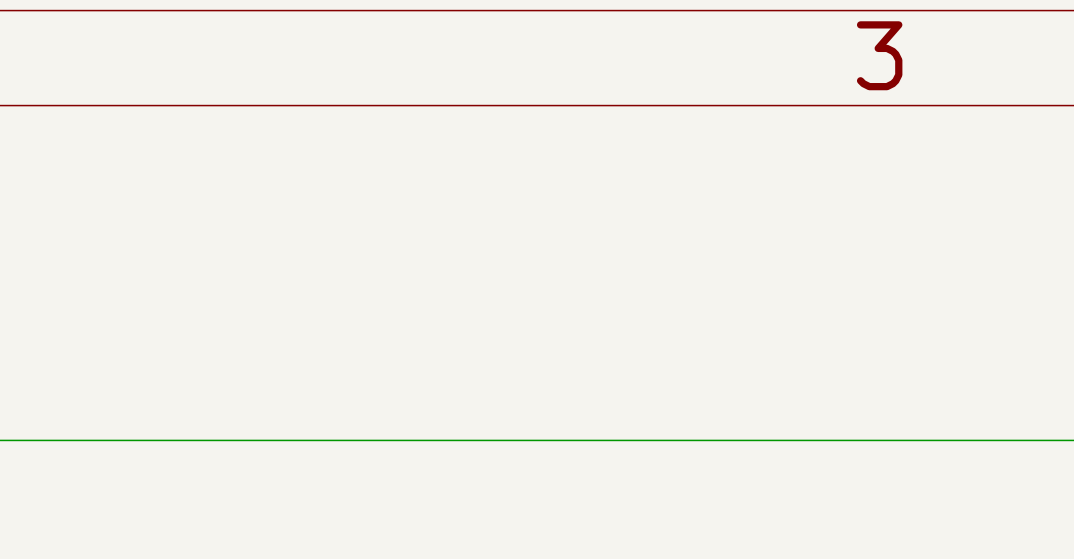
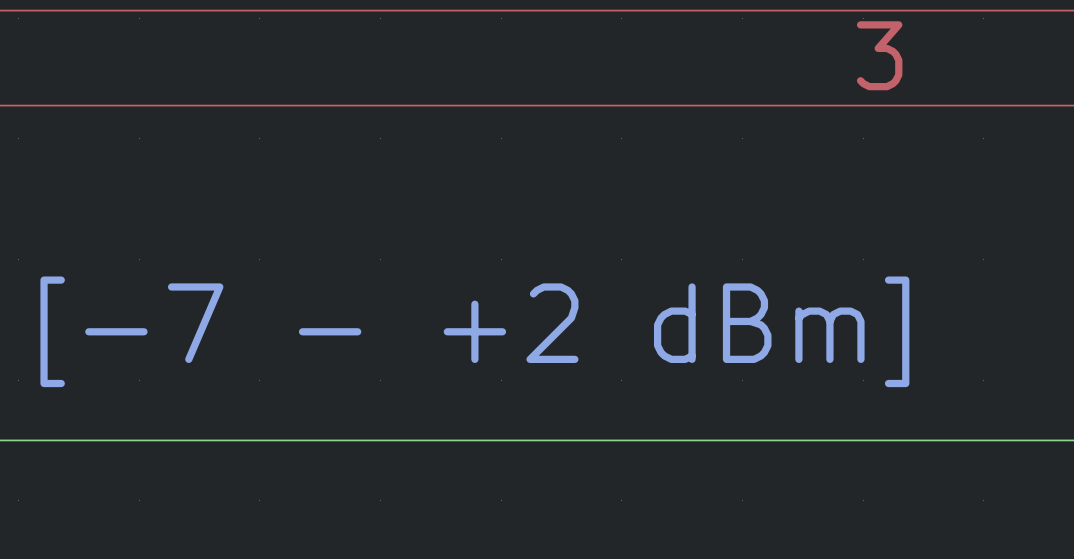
text: none -> [-7 - +2 dBm] (474, 331)

